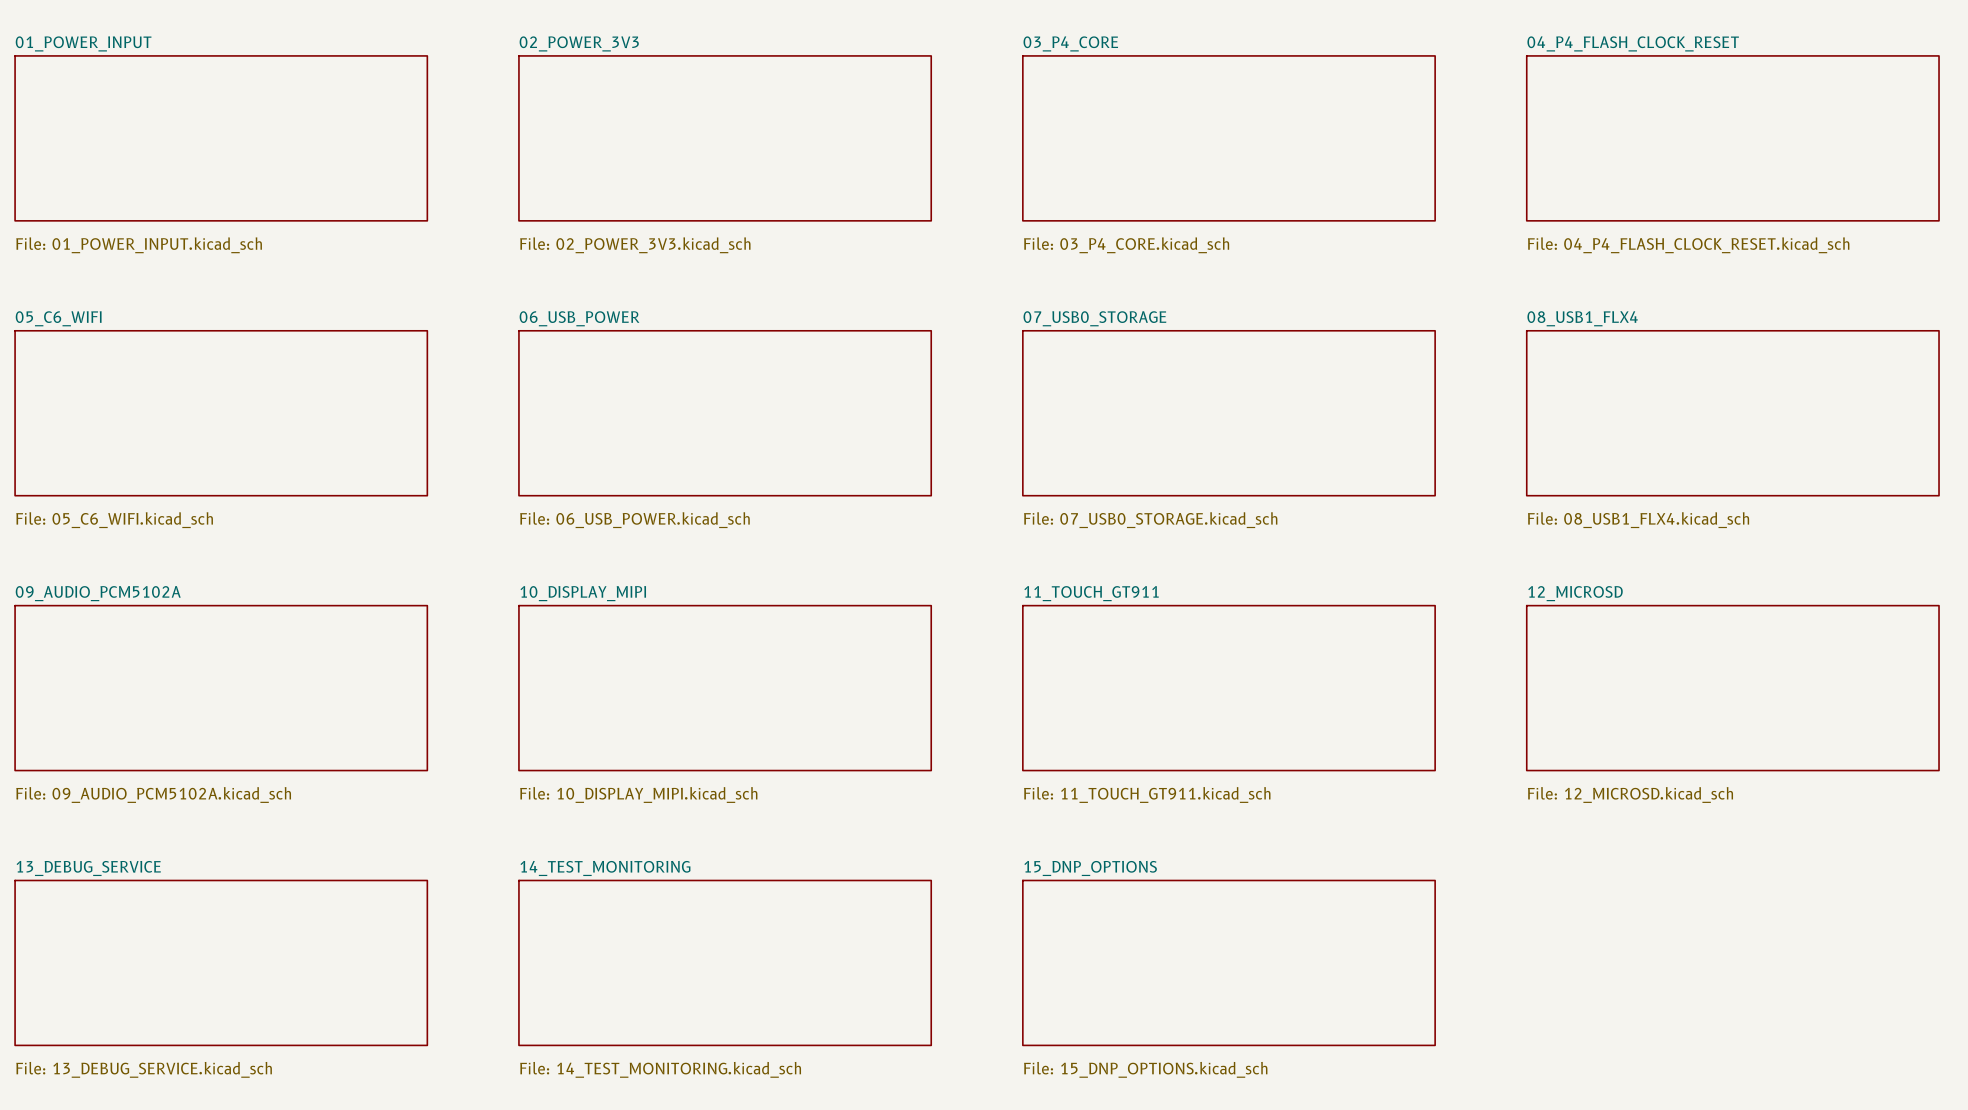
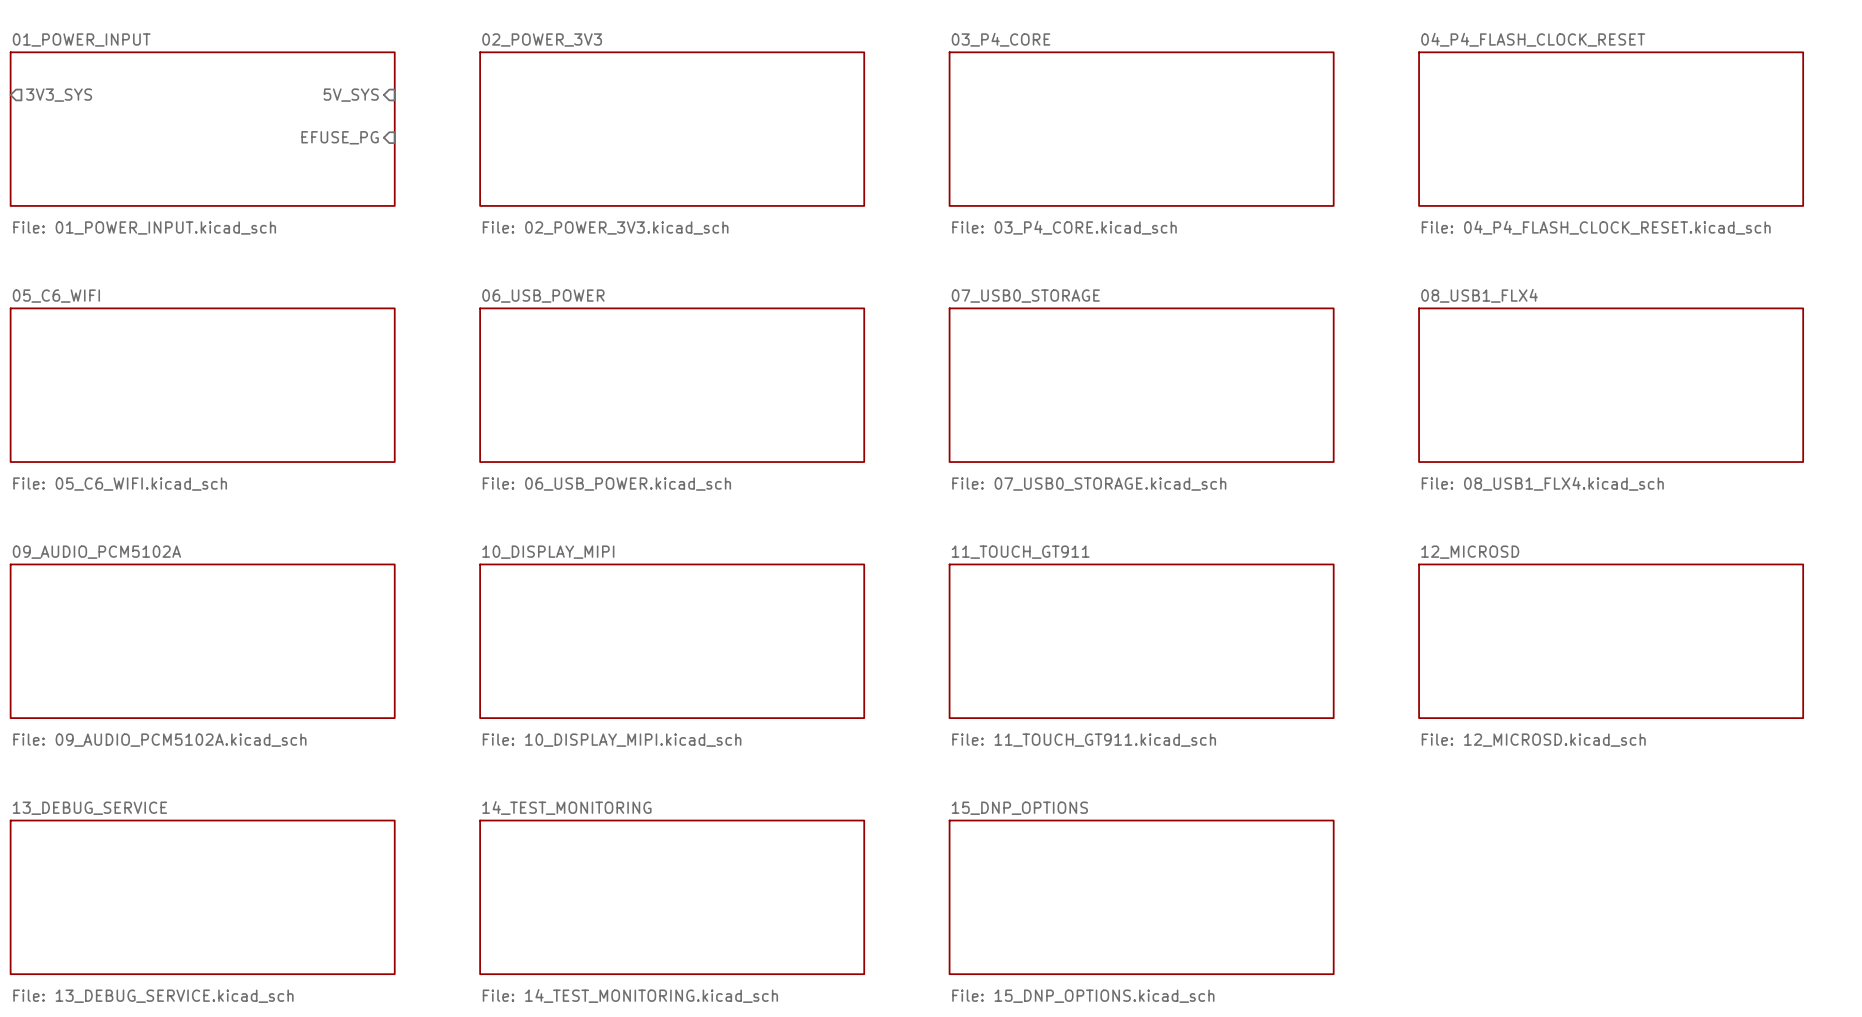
sheet pin: none -> 3V3_SYS (59, 95)
sheet pin: none -> 5V_SYS (351, 95)
sheet pin: none -> EFUSE_PG (340, 137)

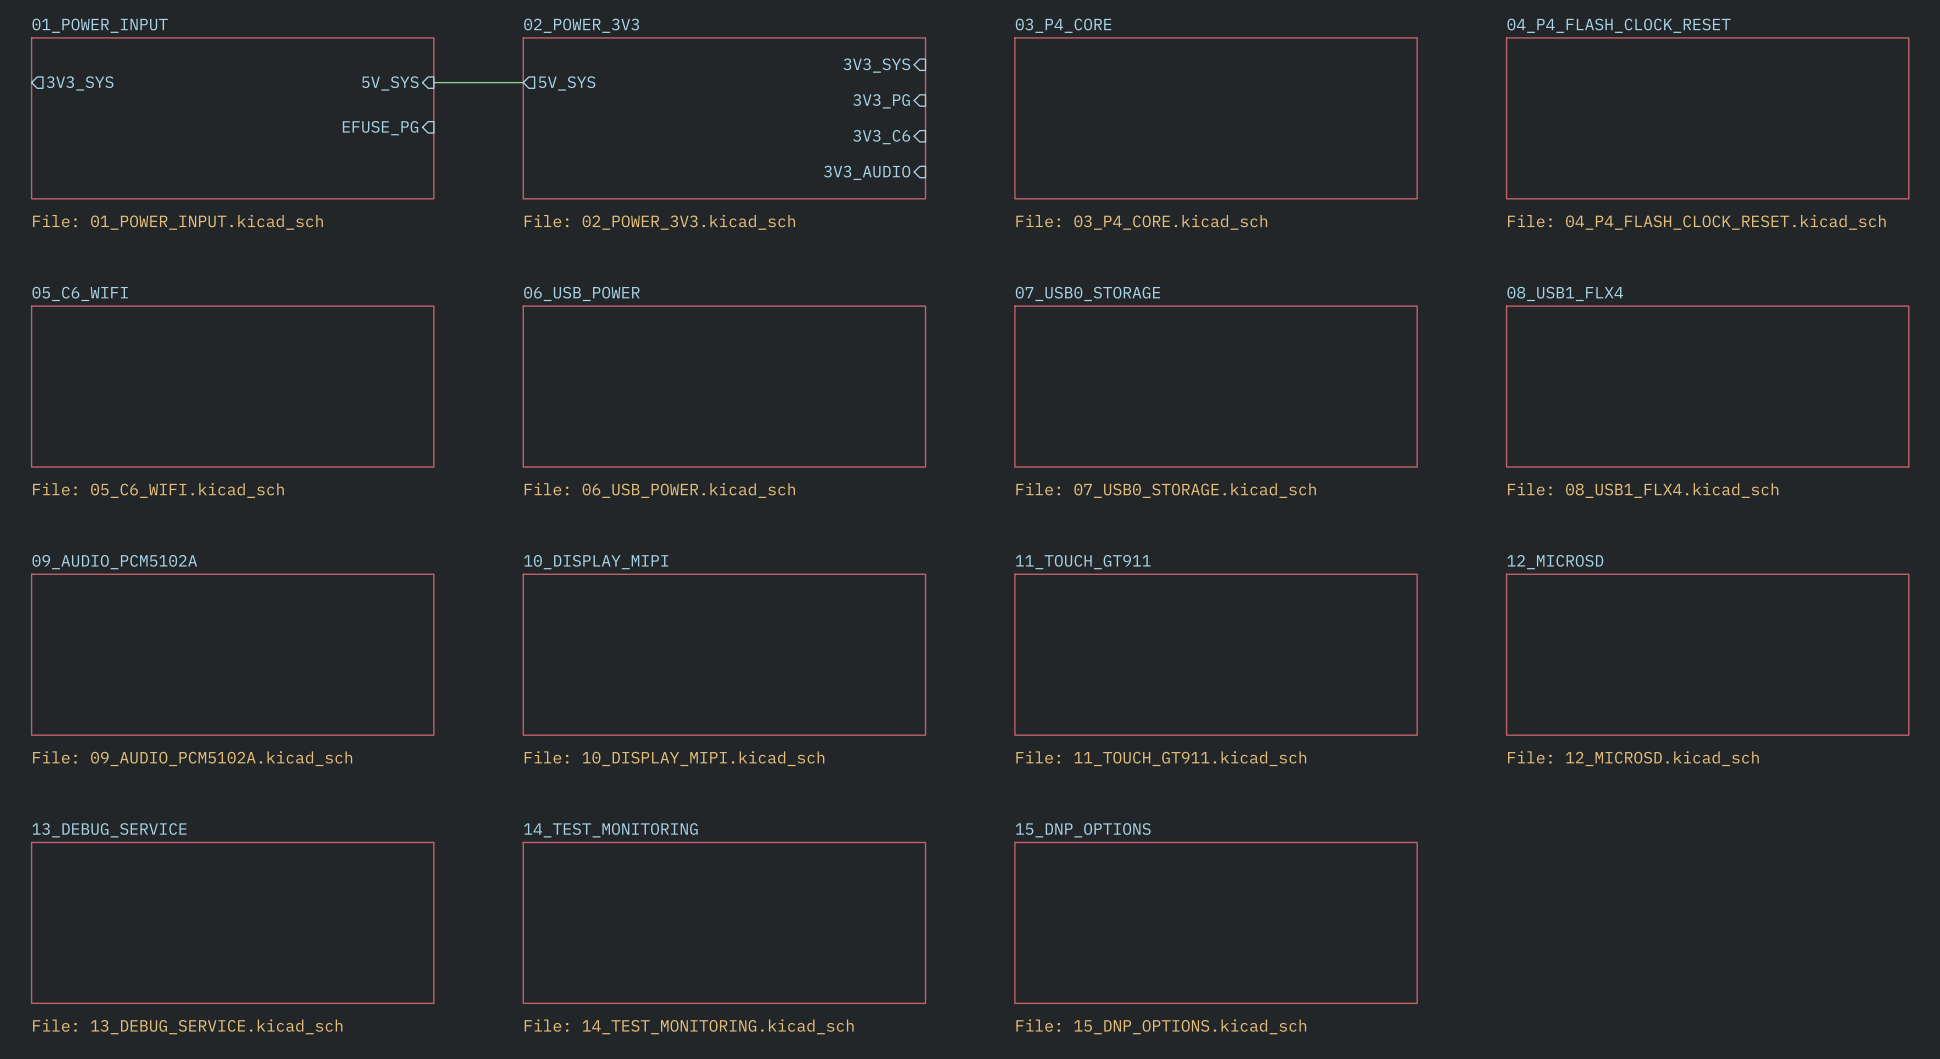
sheet pin: none -> 3V3_SYS (876, 65)
wire: none -> (433, 82) (523, 82)
sheet pin: none -> 5V_SYS (567, 83)
sheet pin: none -> 3V3_PG (881, 101)
sheet pin: none -> 3V3_C6 (881, 137)
sheet pin: none -> 3V3_AUDIO (867, 172)

